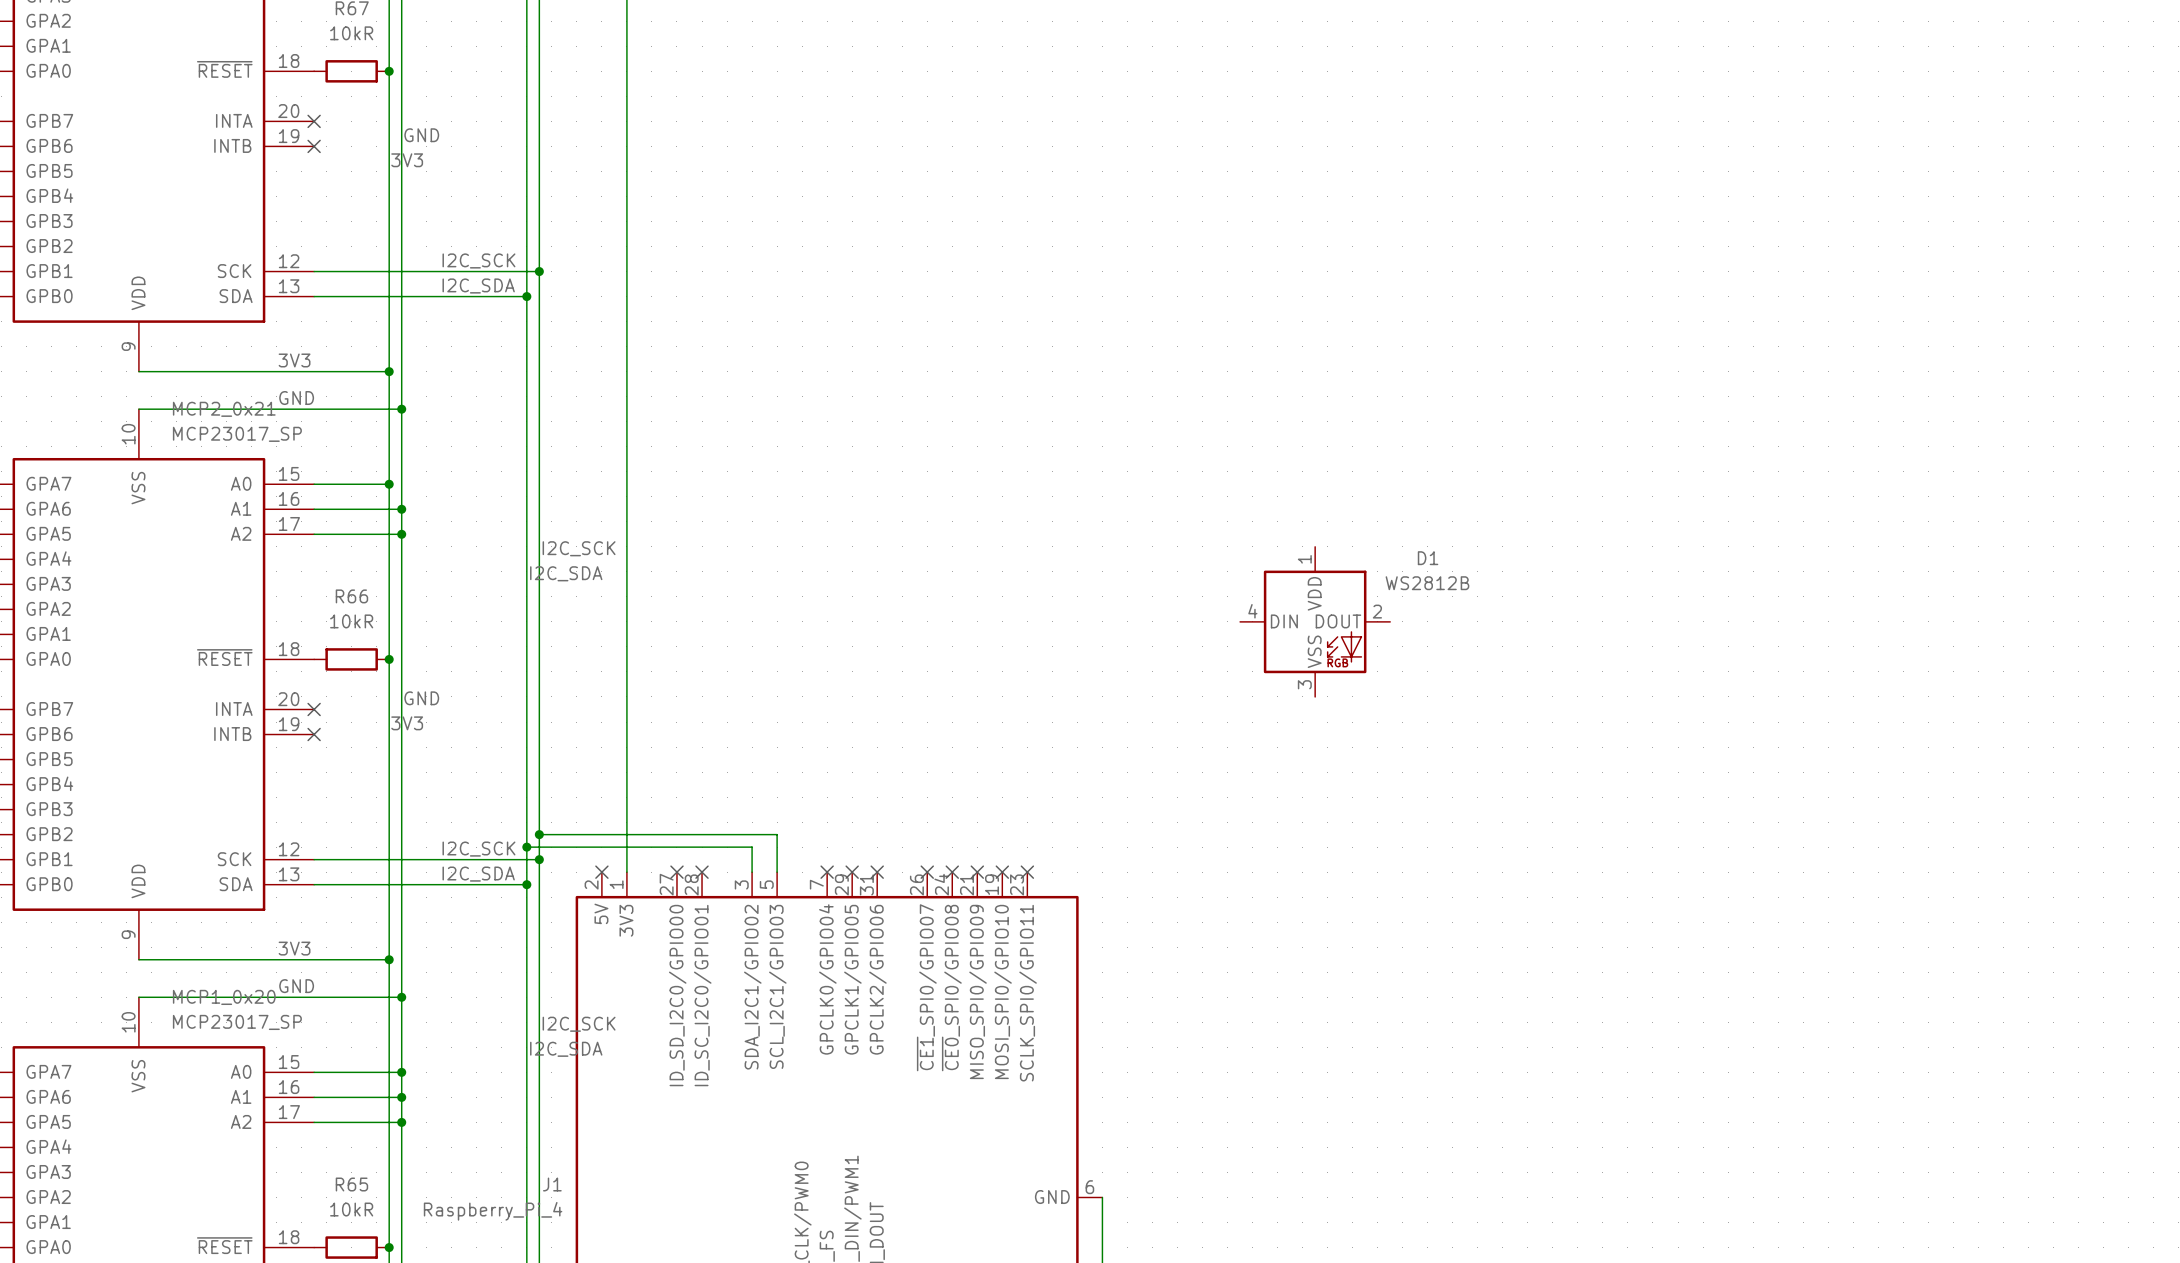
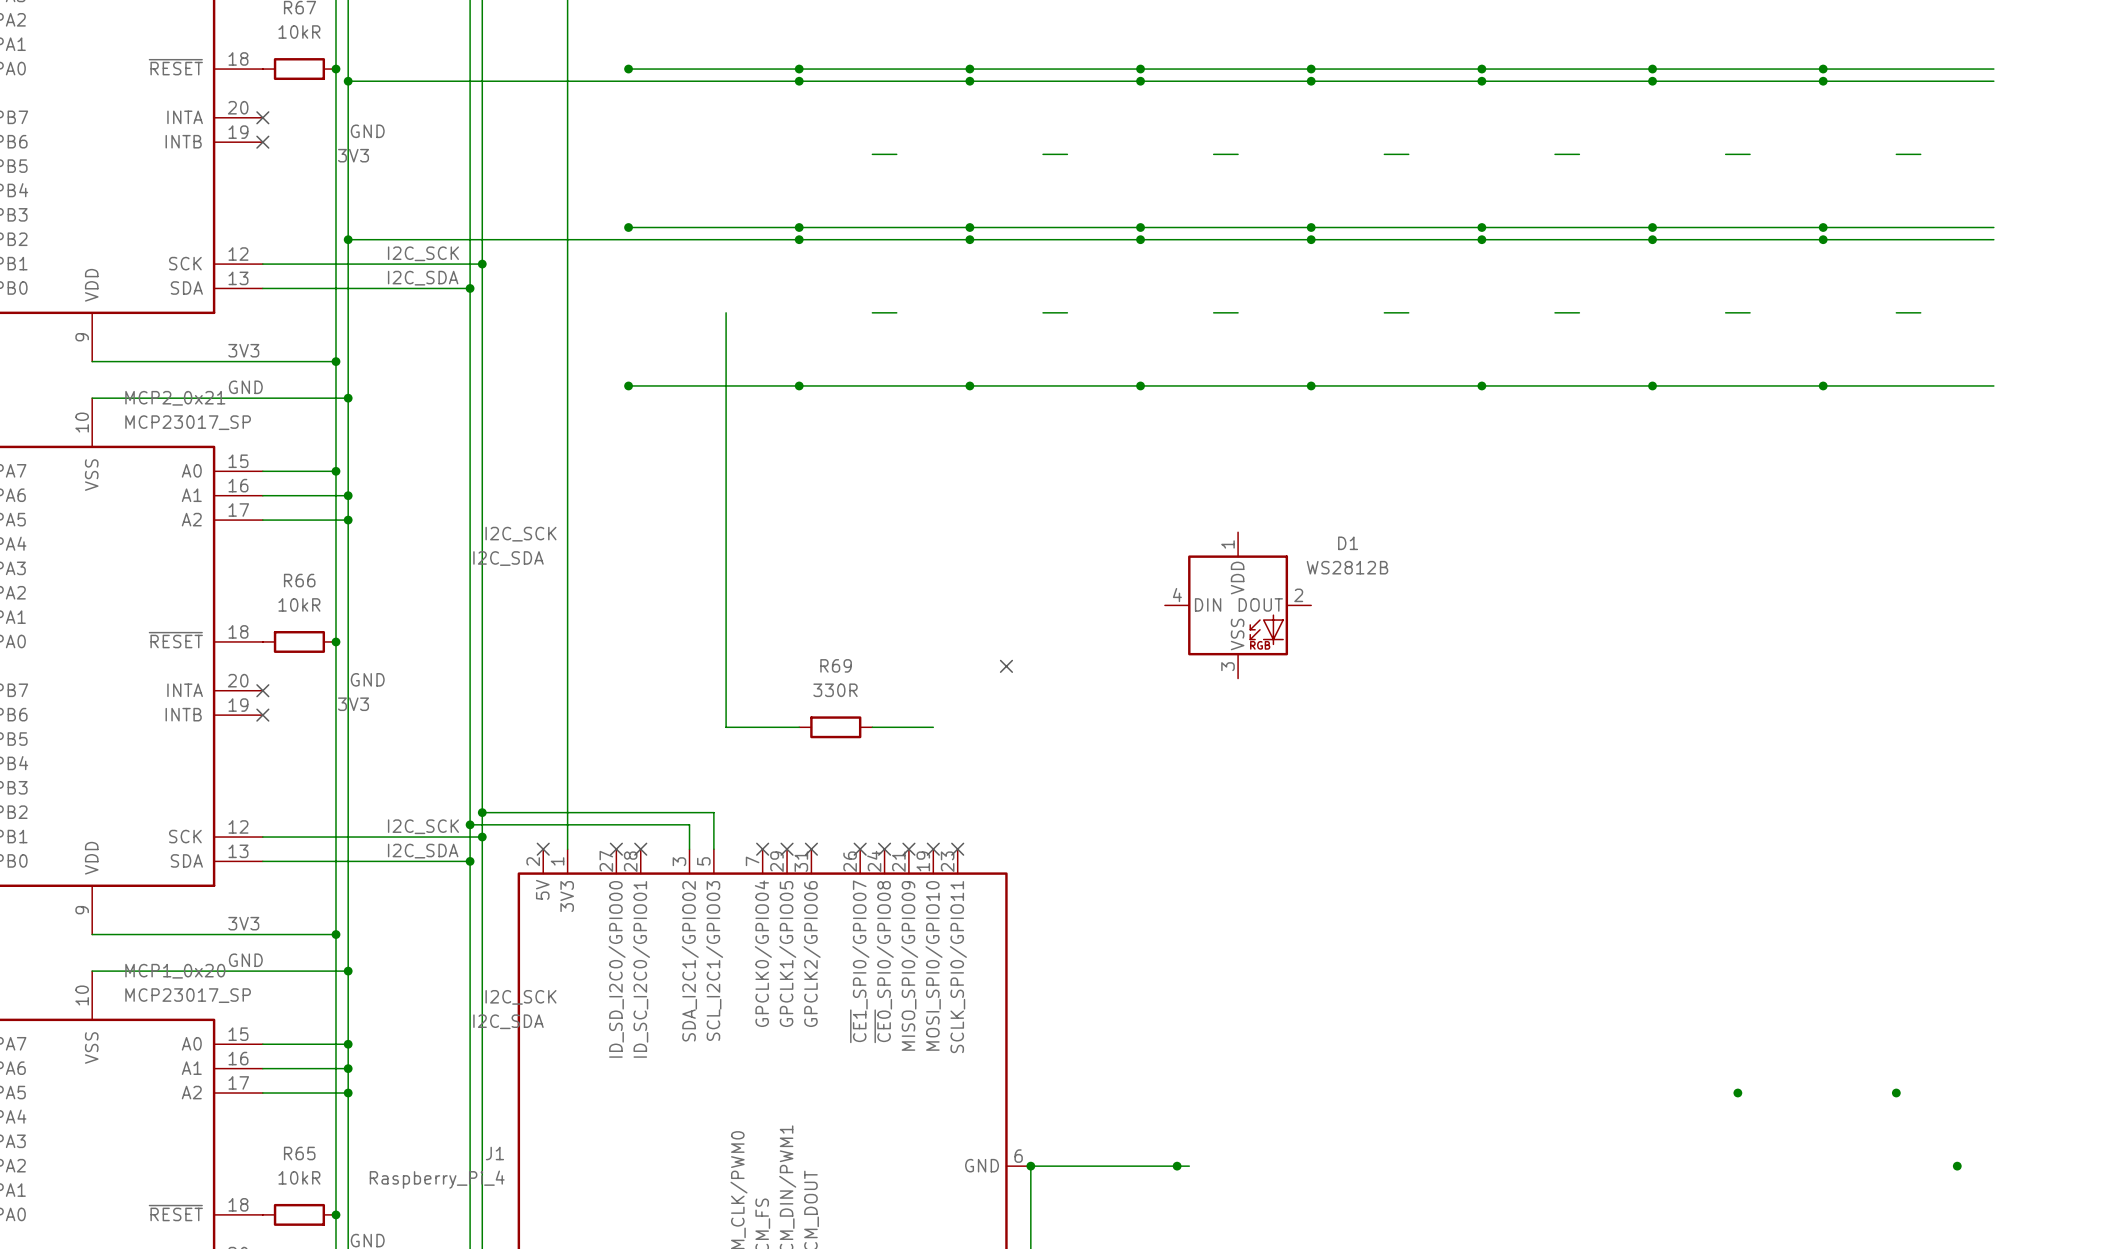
wire: none -> (628, 69) (1993, 69)
junction: none -> (628, 69)
junction: none -> (799, 69)
junction: none -> (969, 69)
junction: none -> (1140, 69)
junction: none -> (1311, 69)
junction: none -> (1481, 69)
junction: none -> (1652, 69)
junction: none -> (1823, 69)
wire: none -> (348, 81) (1993, 81)
junction: none -> (348, 81)
junction: none -> (799, 81)
junction: none -> (969, 81)
junction: none -> (1140, 81)
junction: none -> (1311, 81)
junction: none -> (1481, 81)
junction: none -> (1652, 81)
junction: none -> (1823, 81)
wire: none -> (872, 154) (896, 154)
wire: none -> (1043, 154) (1067, 154)
wire: none -> (1213, 154) (1238, 154)
wire: none -> (1384, 154) (1408, 154)
wire: none -> (1555, 154) (1579, 154)
wire: none -> (1725, 154) (1750, 154)
wire: none -> (1896, 154) (1920, 154)
wire: none -> (628, 227) (1993, 227)
junction: none -> (628, 227)
junction: none -> (799, 227)
junction: none -> (969, 227)
junction: none -> (1140, 227)
junction: none -> (1311, 227)
junction: none -> (1481, 227)
junction: none -> (1652, 227)
junction: none -> (1823, 227)
wire: none -> (348, 239) (1993, 239)
junction: none -> (348, 239)
junction: none -> (799, 239)
junction: none -> (969, 239)
junction: none -> (1140, 239)
junction: none -> (1311, 239)
junction: none -> (1481, 239)
junction: none -> (1652, 239)
junction: none -> (1823, 239)
wire: none -> (726, 312) (726, 727) (799, 727)
wire: none -> (872, 312) (896, 312)
wire: none -> (1043, 312) (1067, 312)
wire: none -> (1213, 312) (1238, 312)
wire: none -> (1384, 312) (1408, 312)
wire: none -> (1555, 312) (1579, 312)
wire: none -> (1725, 312) (1750, 312)
wire: none -> (1896, 312) (1920, 312)
wire: none -> (628, 385) (1993, 385)
junction: none -> (628, 385)
junction: none -> (799, 385)
junction: none -> (969, 385)
junction: none -> (1140, 385)
junction: none -> (1311, 385)
junction: none -> (1481, 385)
junction: none -> (1652, 385)
junction: none -> (1823, 385)
no-connect mark: none -> (1006, 666)
R69: none -> 330R (835, 727)
wire: none -> (872, 727) (933, 727)
junction: none -> (1737, 1093)
junction: none -> (1896, 1093)
wire: none -> (1030, 1166) (1189, 1166)
junction: none -> (1030, 1166)
junction: none -> (1177, 1166)
junction: none -> (1957, 1166)

